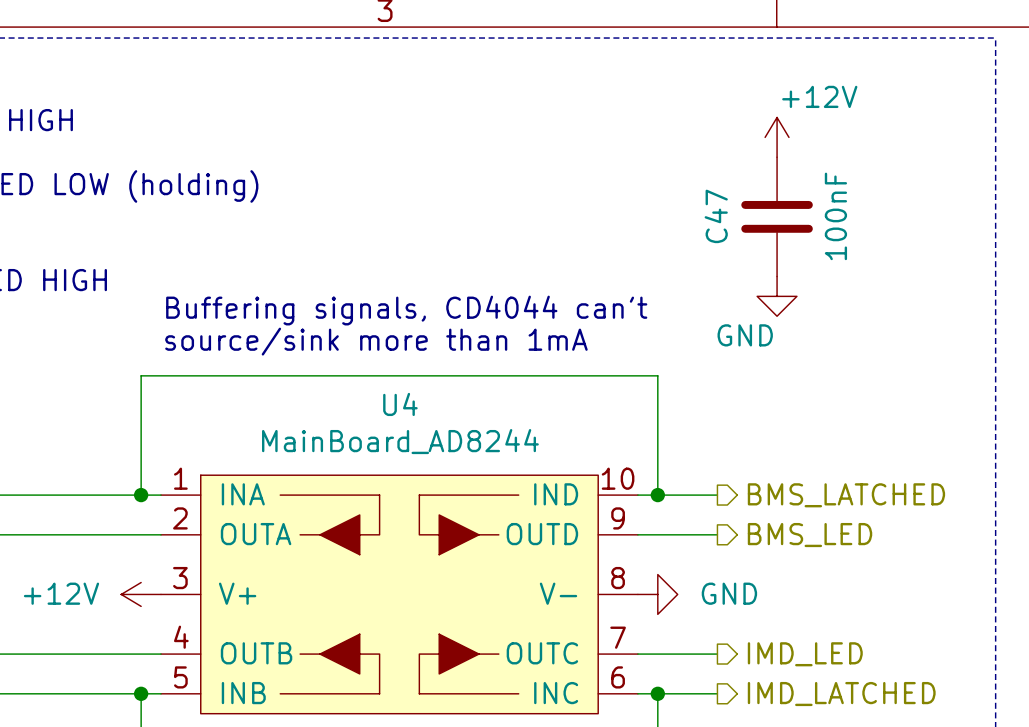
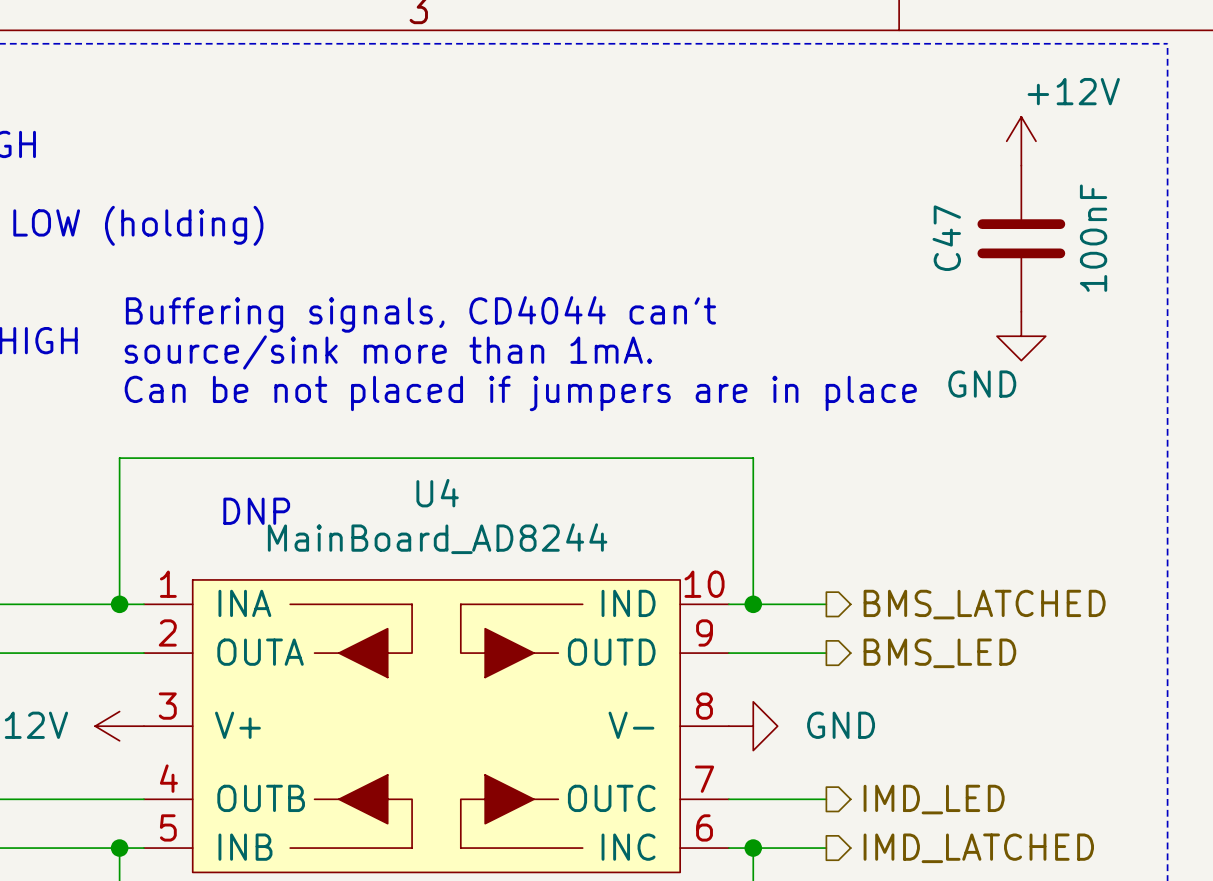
power symbol position: +12V (777, 137) -> +12V (1021, 141)
C47 position: (777, 216) -> (1021, 238)
text: none -> source/sink more than 1mA. (388, 352)
power symbol position: GND (777, 296) -> GND (1021, 336)
text position: Buffering signals, CD4044 can't (406, 310) -> Buffering signals, CD4044 can't (420, 314)
text: none -> Can be not placed if jumpers are in place (520, 393)
text: source/sink more than 1mA (376, 341) -> none
text: none -> DNP (256, 511)

